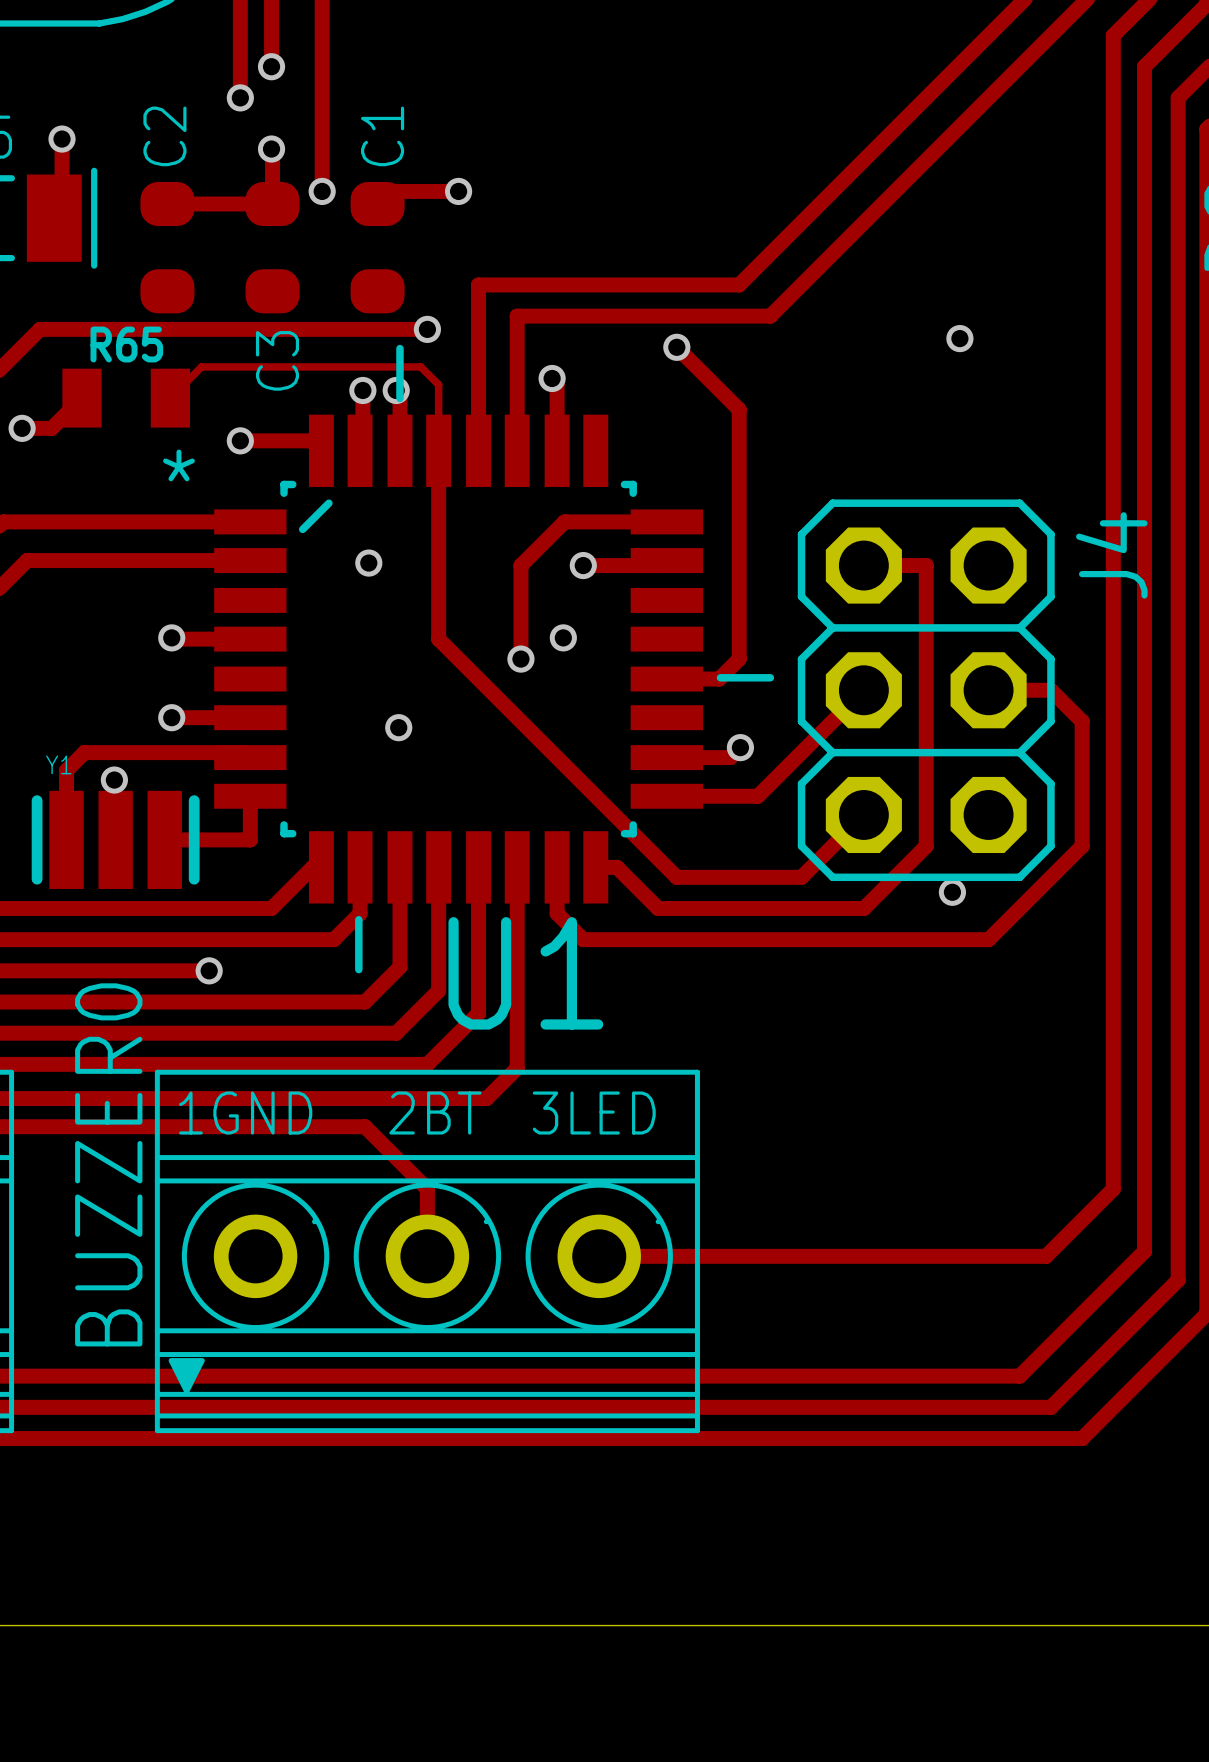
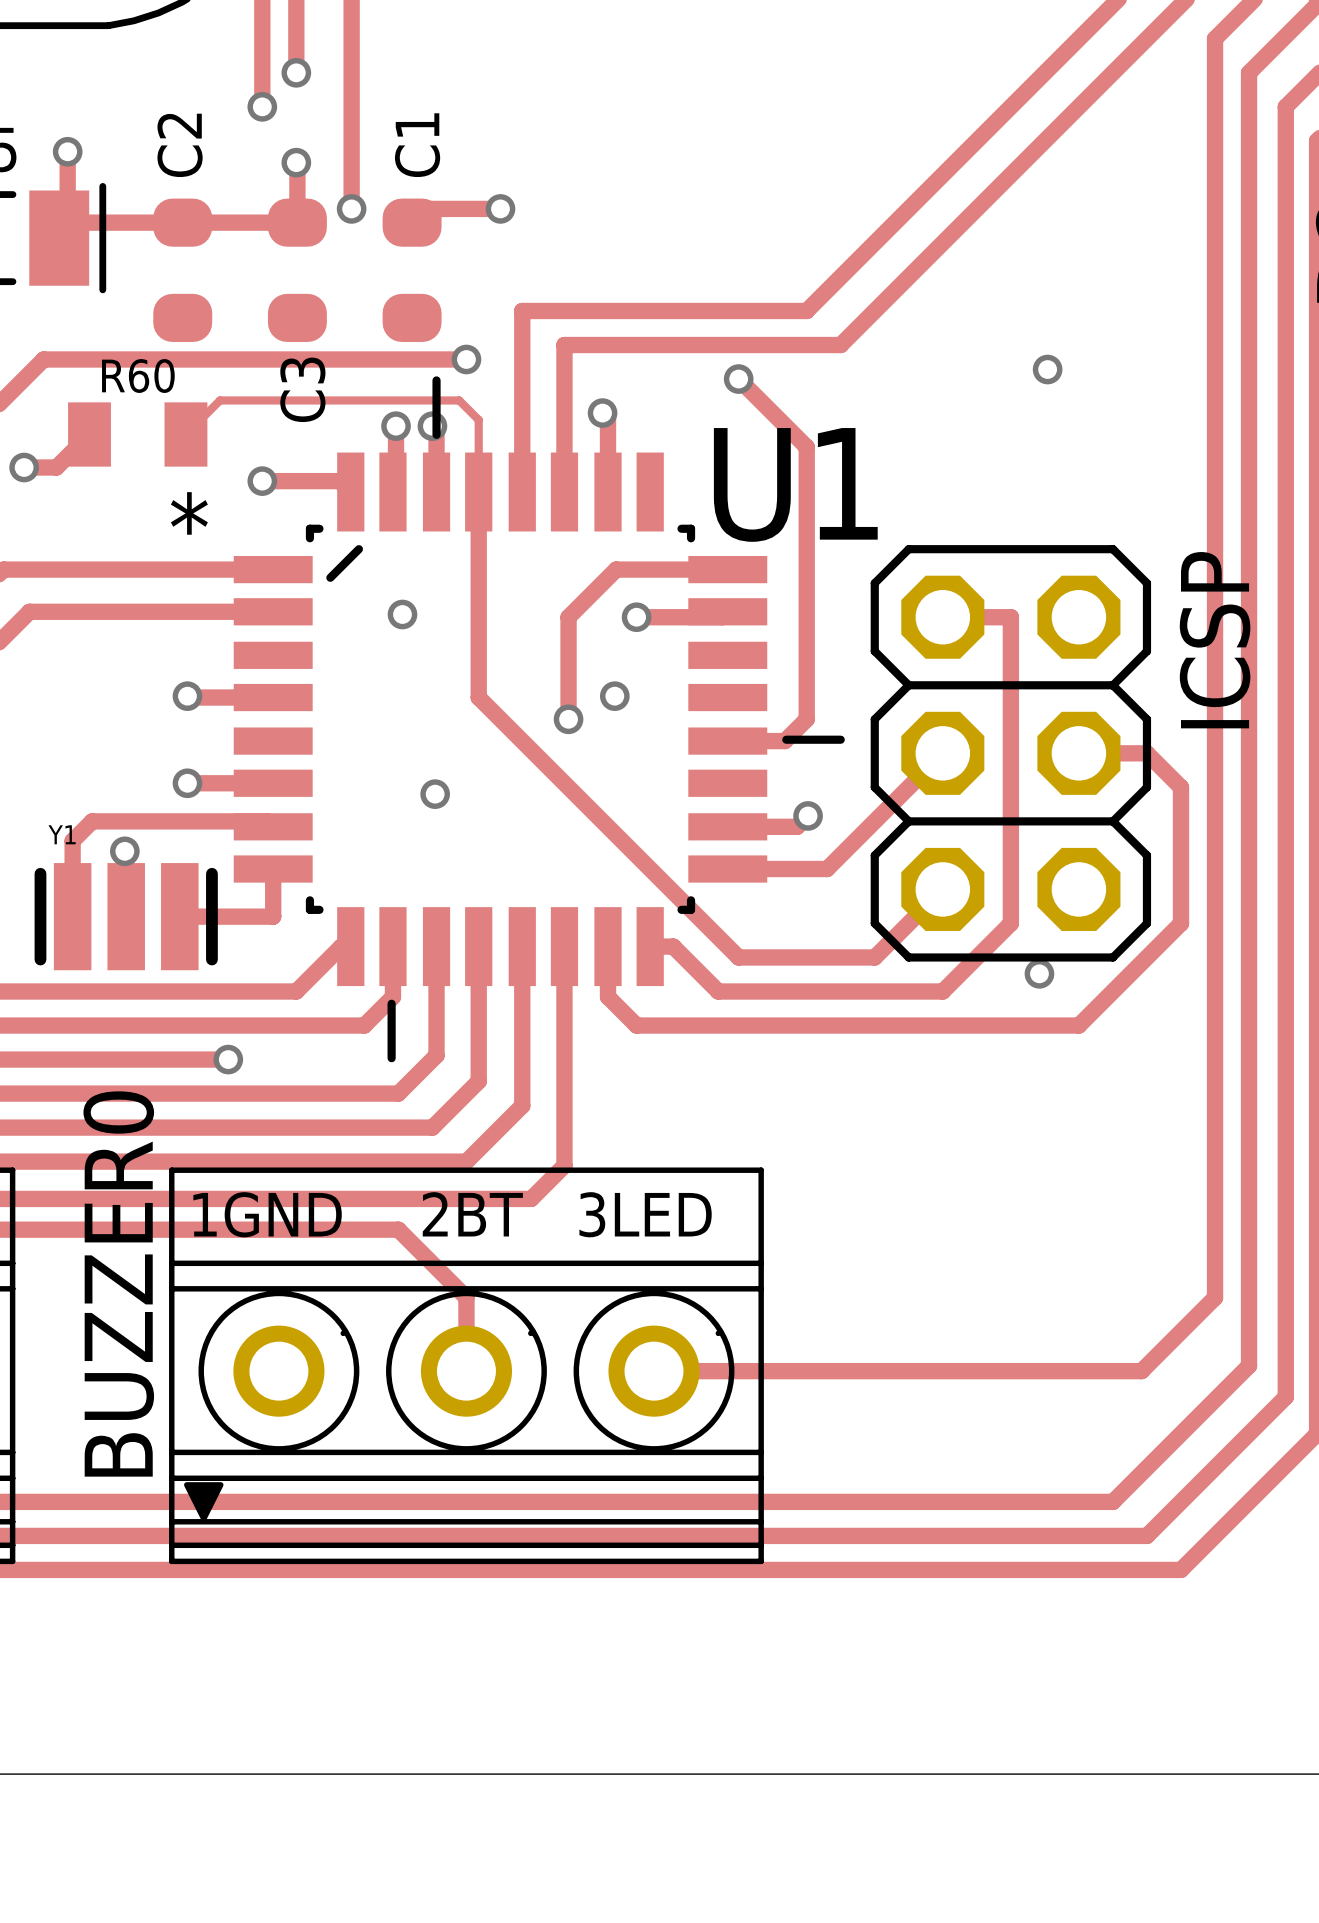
track: none -> (182, 222) (74, 222) (67, 229)
R65 name: R65 (126, 344) -> R60 (138, 376)
J4 name: J4 (1111, 555) -> ICSP (1215, 640)
U1 name position: U1 (525, 973) -> U1 (795, 484)

